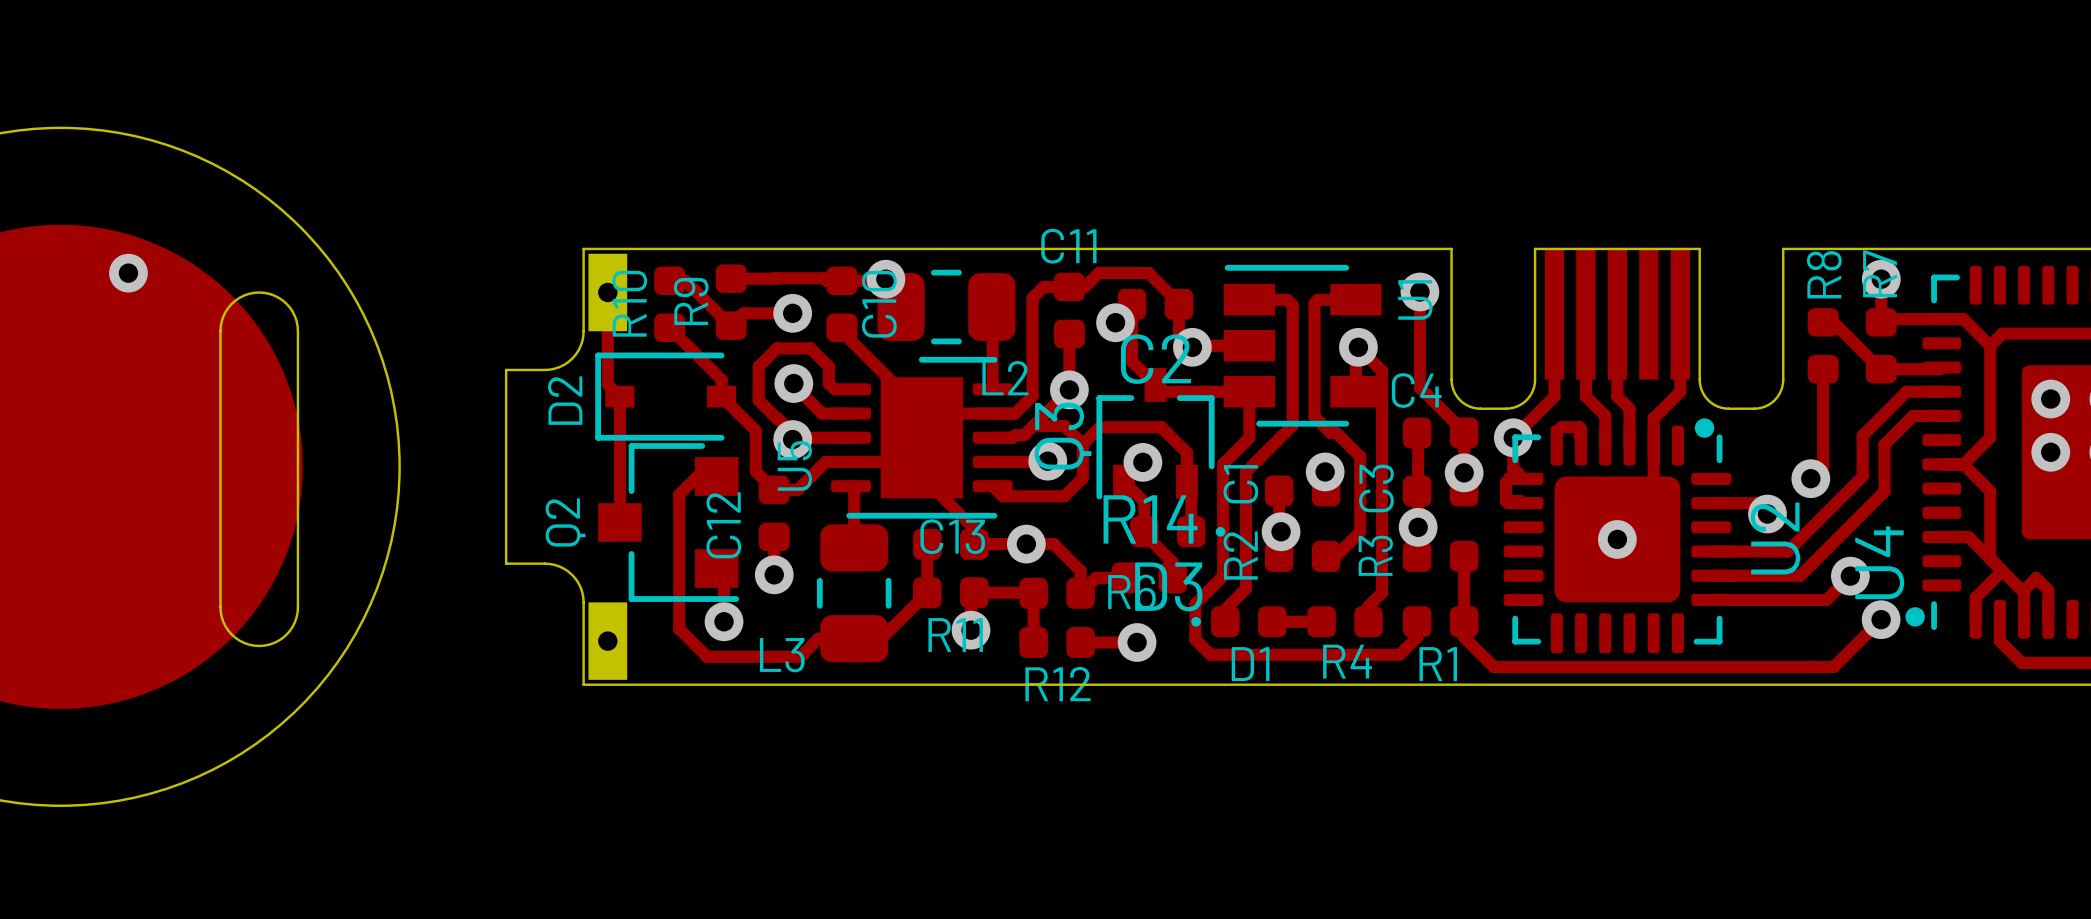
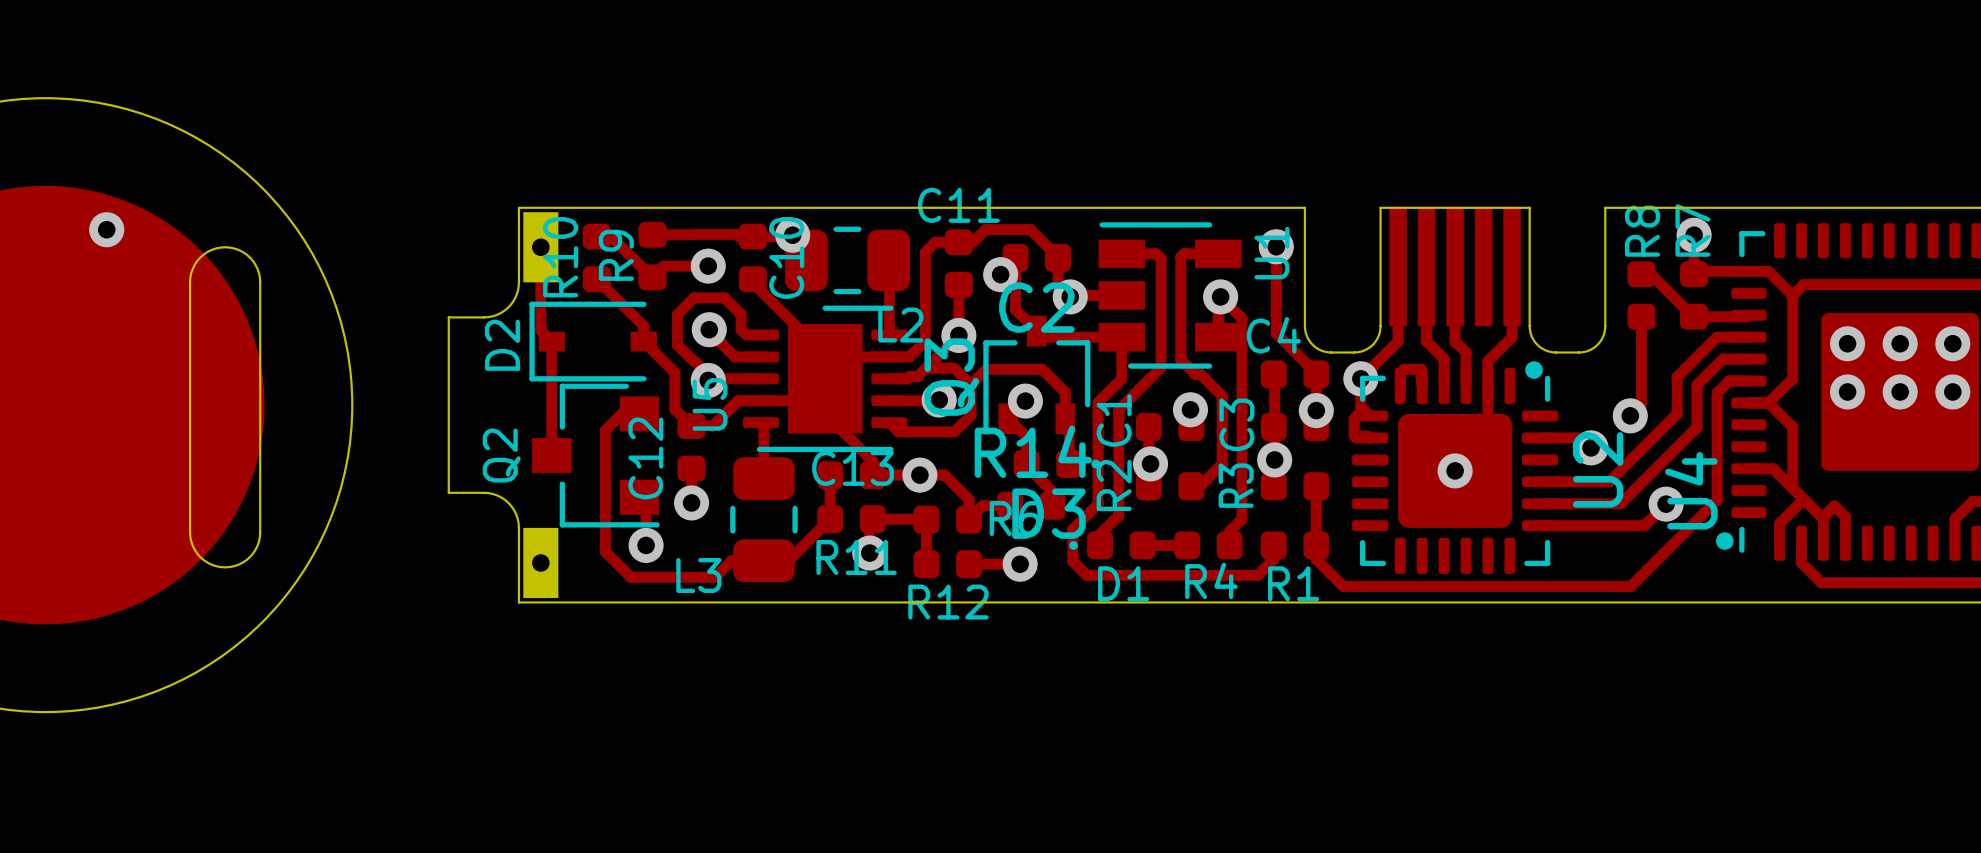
track: (1881, 619) (1833, 667) (1811, 667) -> (1748, 381) (1729, 381) (1717, 393) (1717, 500) (1630, 586)
via: (1881, 619) -> none

